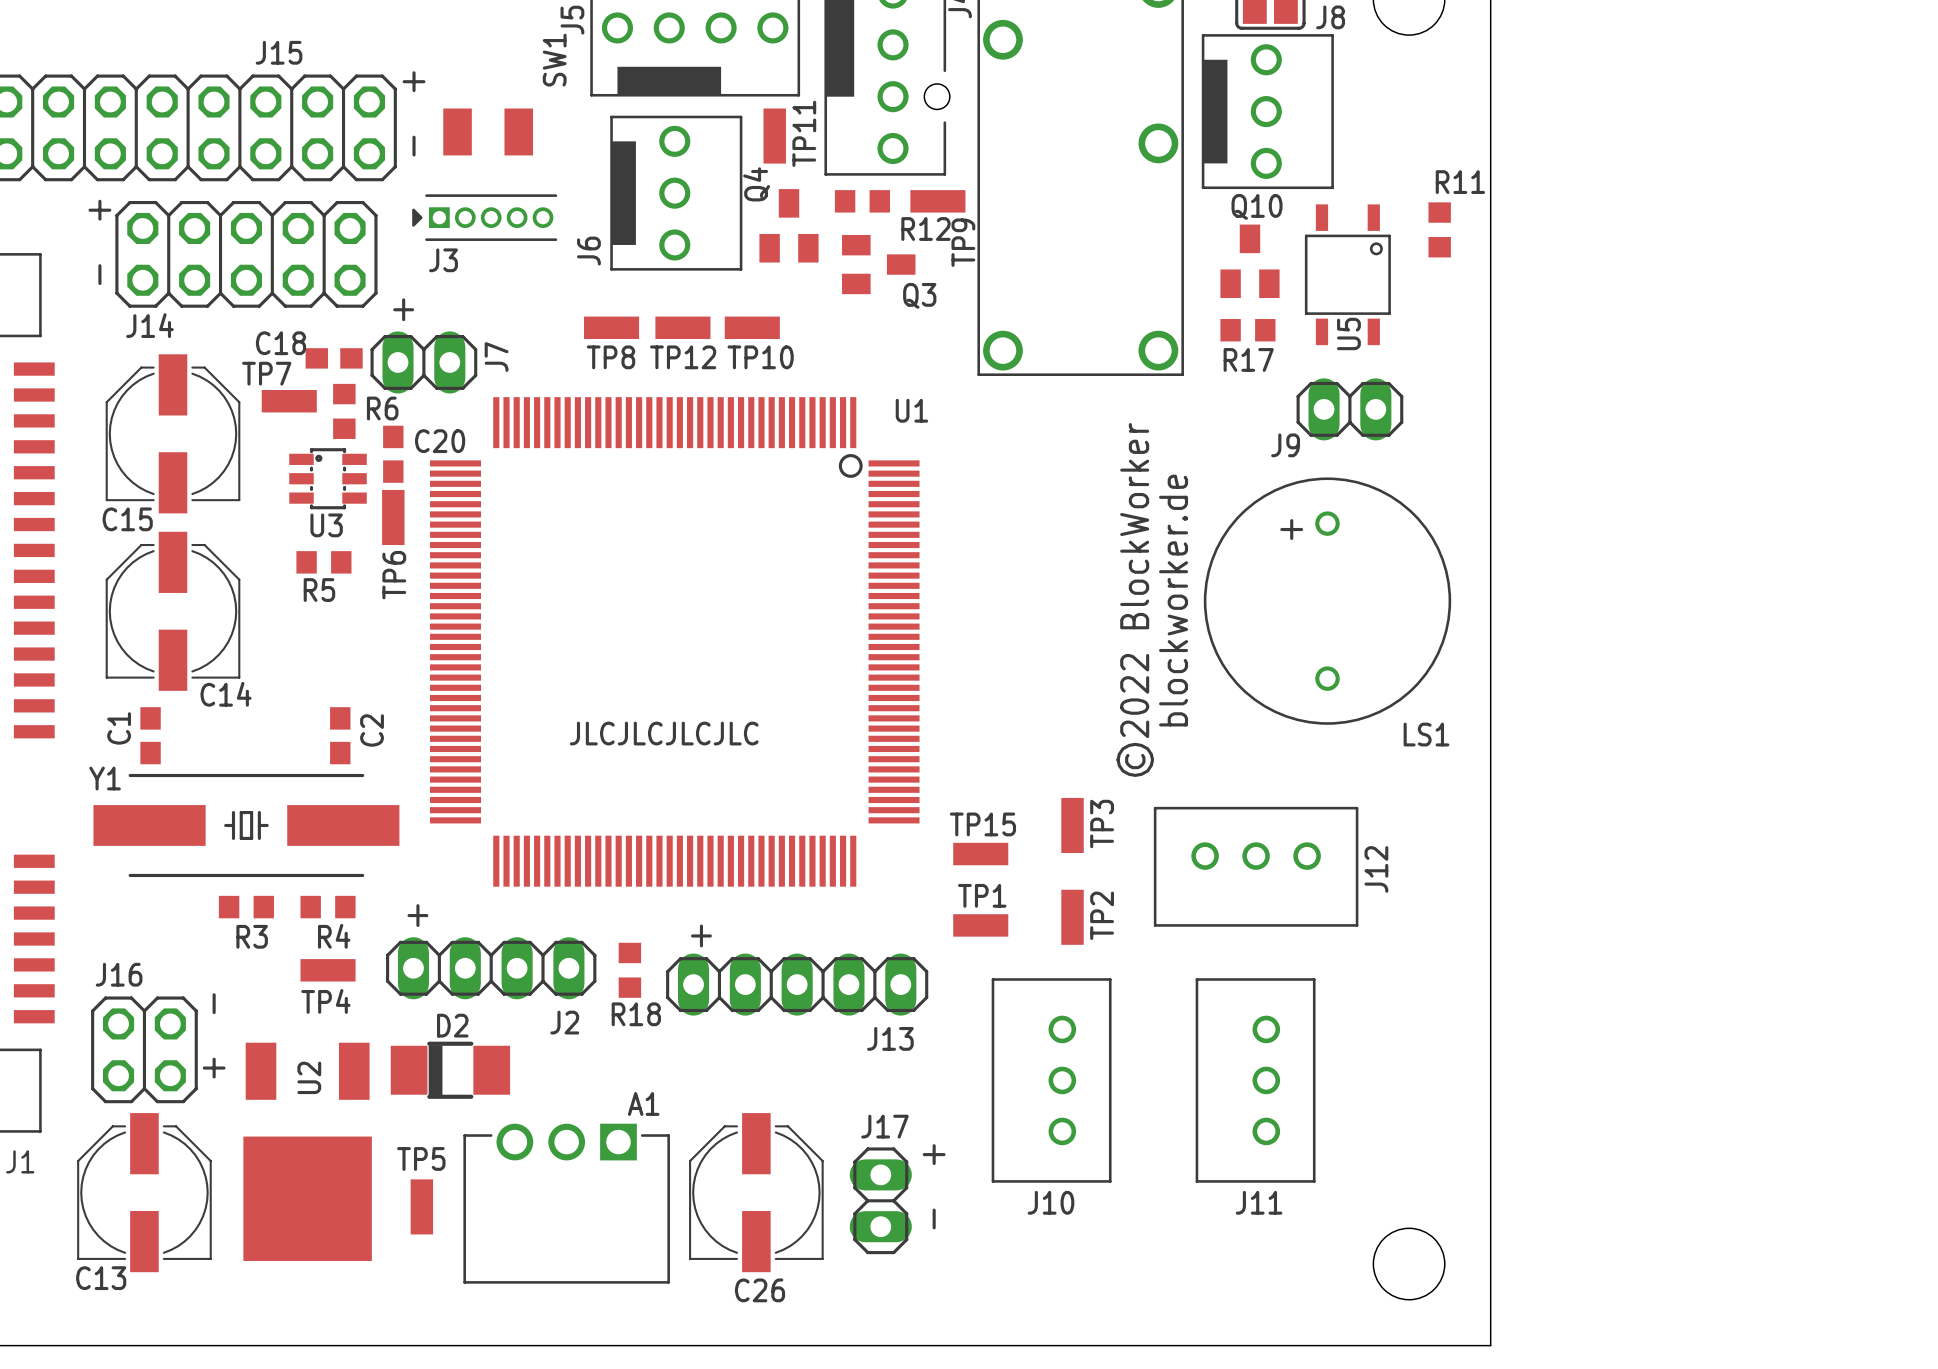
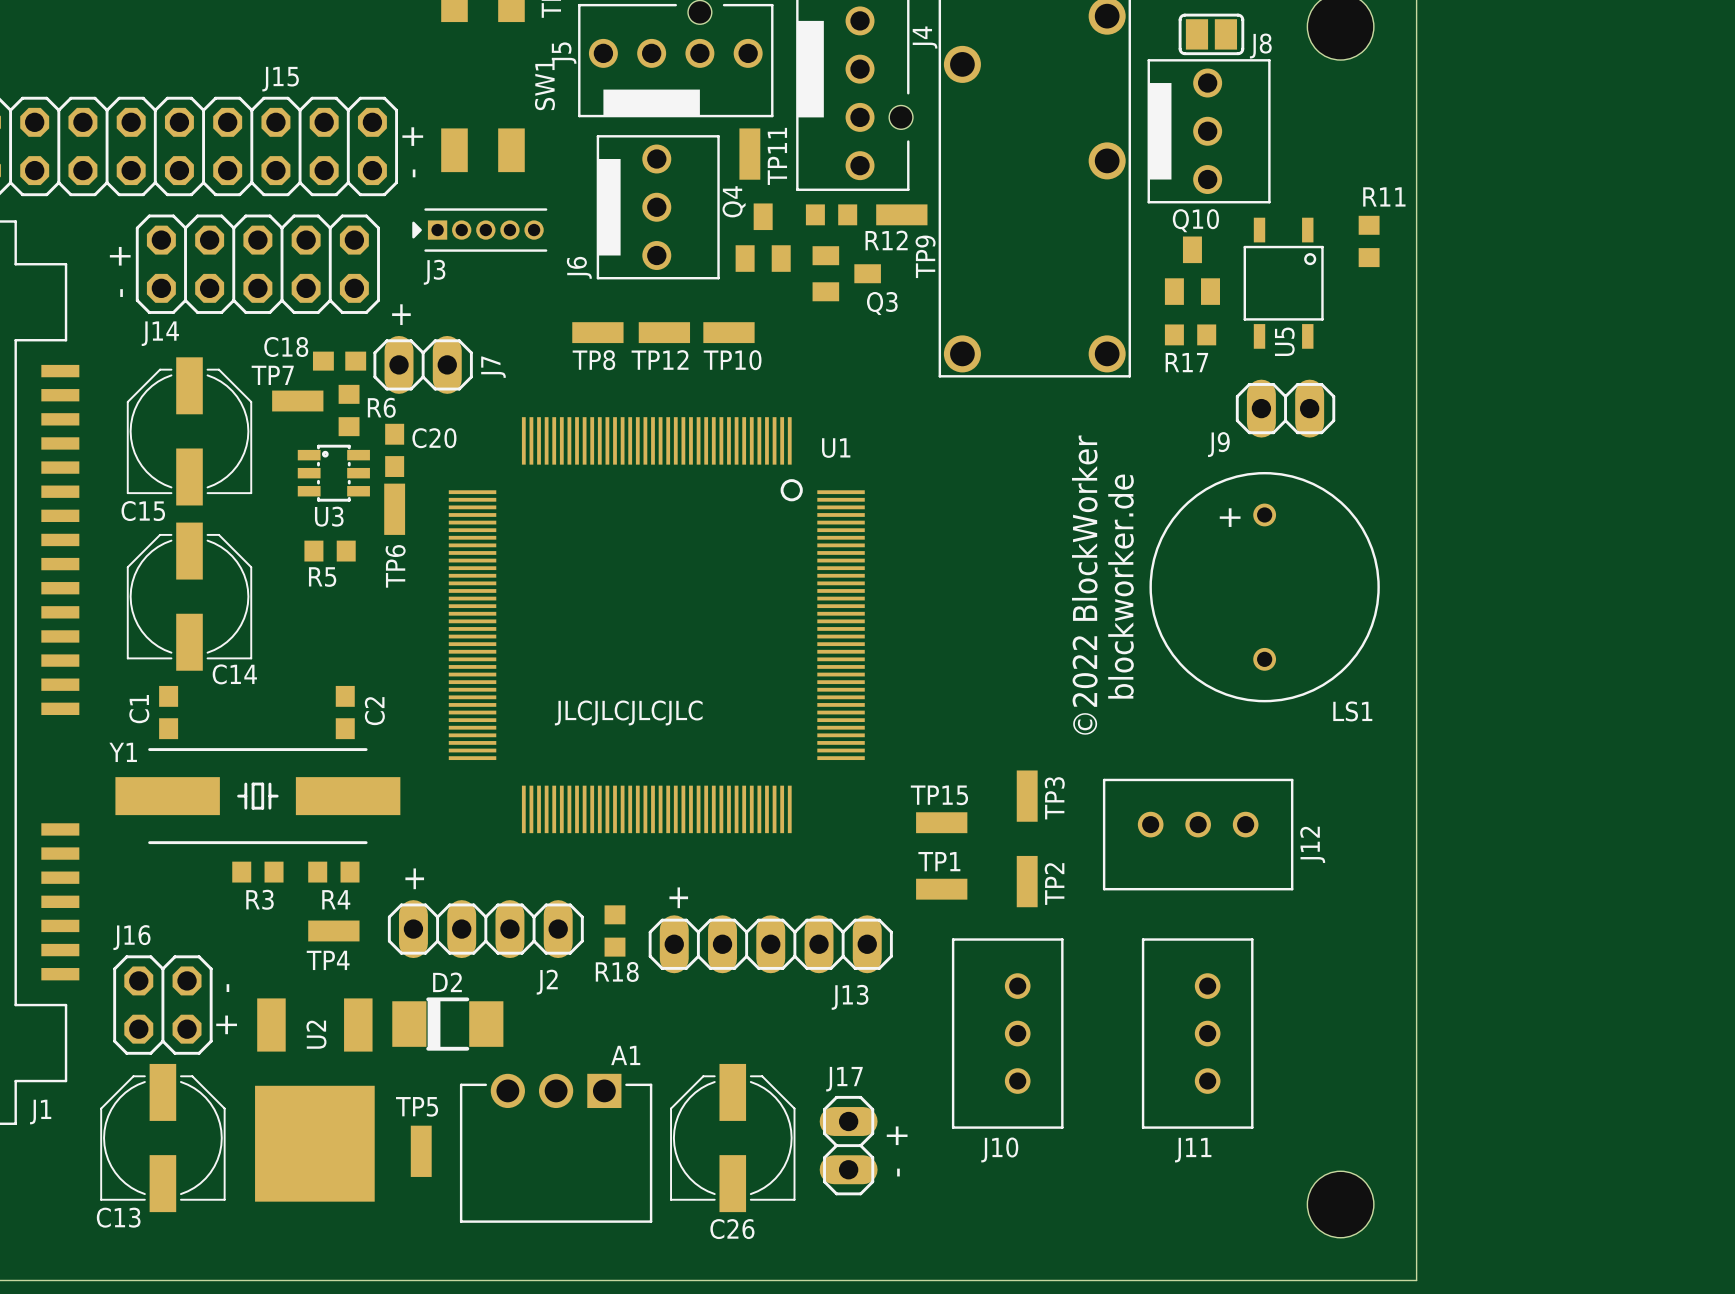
U1 footprint: [430, 397, 920, 887] -> [448, 417, 865, 834]
U1 name position: U1 (911, 410) -> U1 (836, 448)

